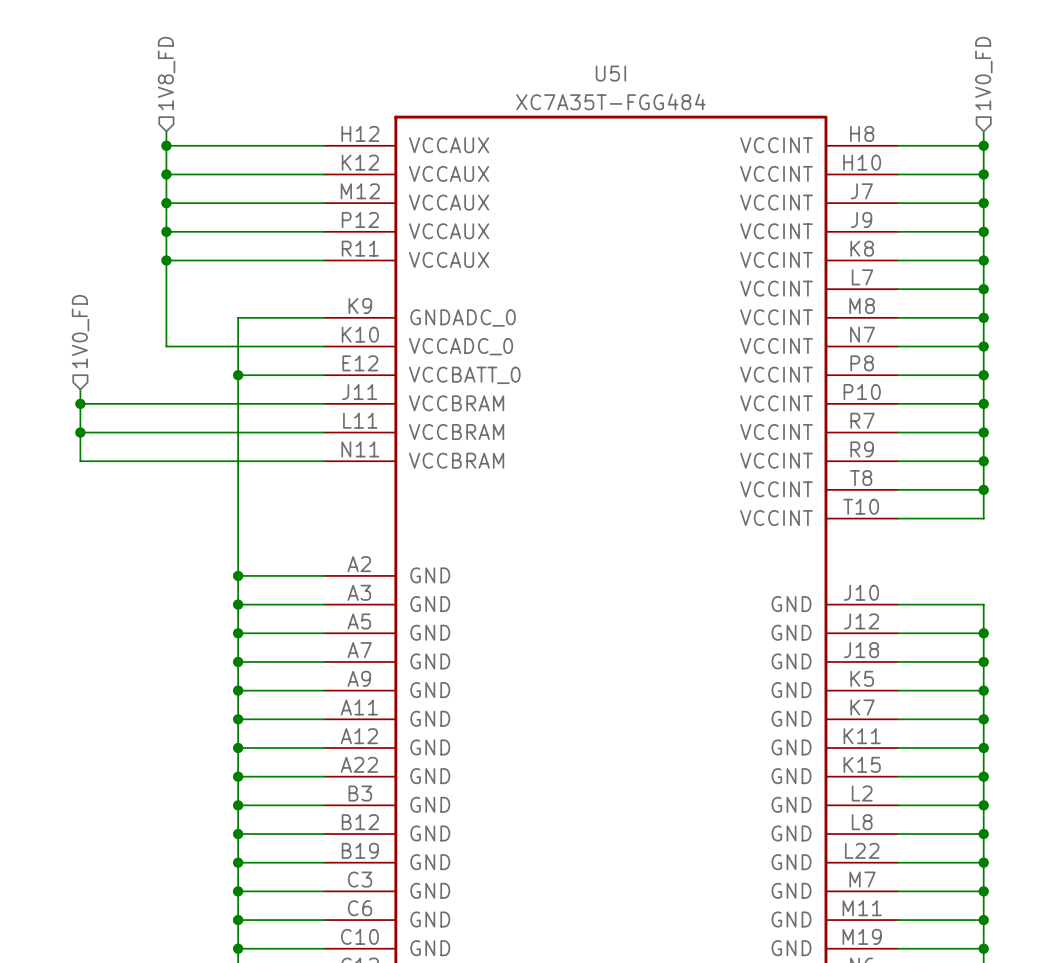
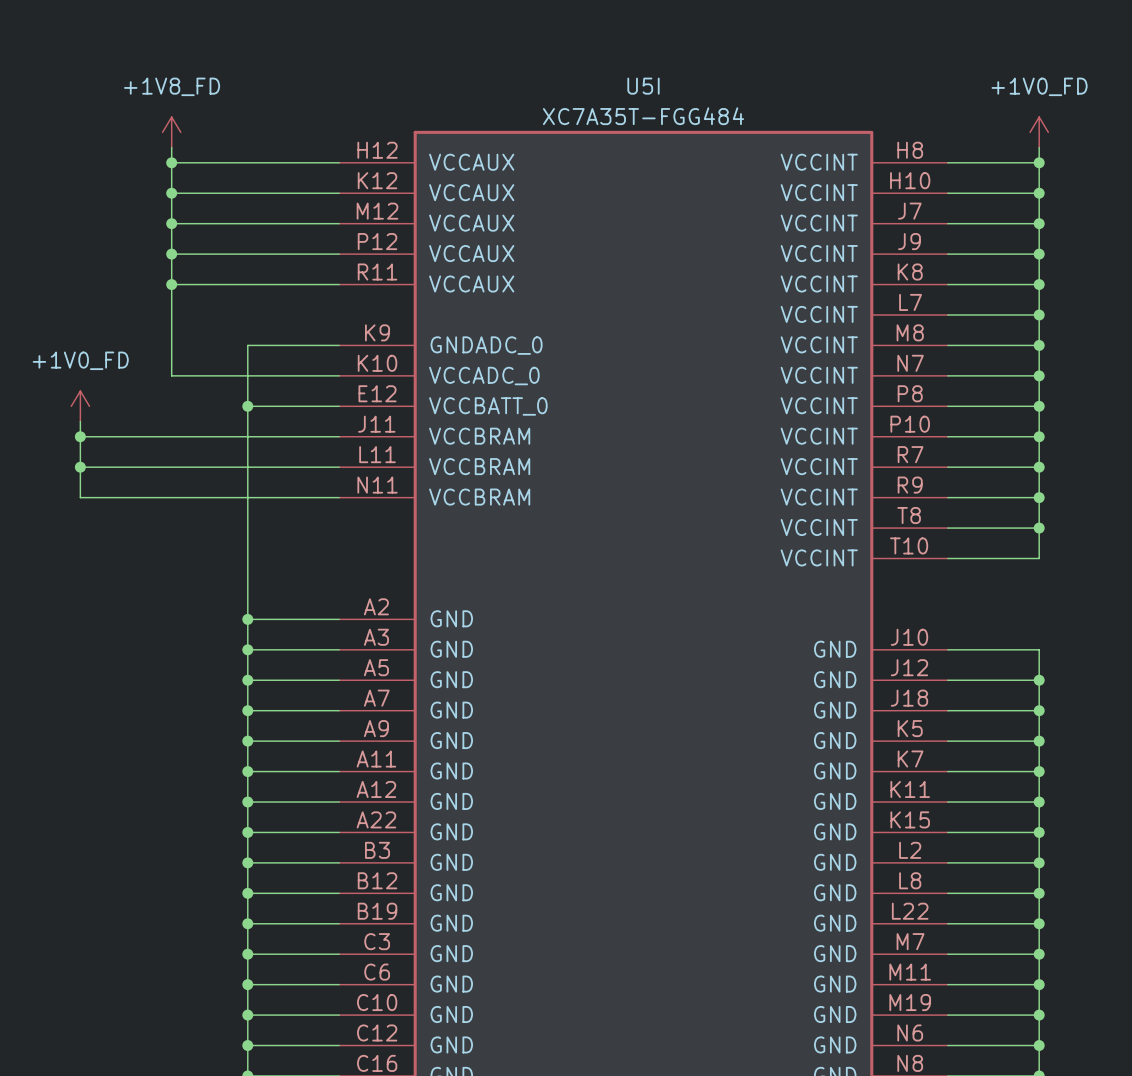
hierarchical label: 1V8_FD (166, 73) -> none
hierarchical label: 1V0_FD (983, 73) -> none
power symbol: none -> +1V8_FD (171, 132)
power symbol: none -> +1V0_FD (1039, 132)
hierarchical label: 1V0_FD (80, 331) -> none
power symbol: none -> +1V0_FD (80, 406)

